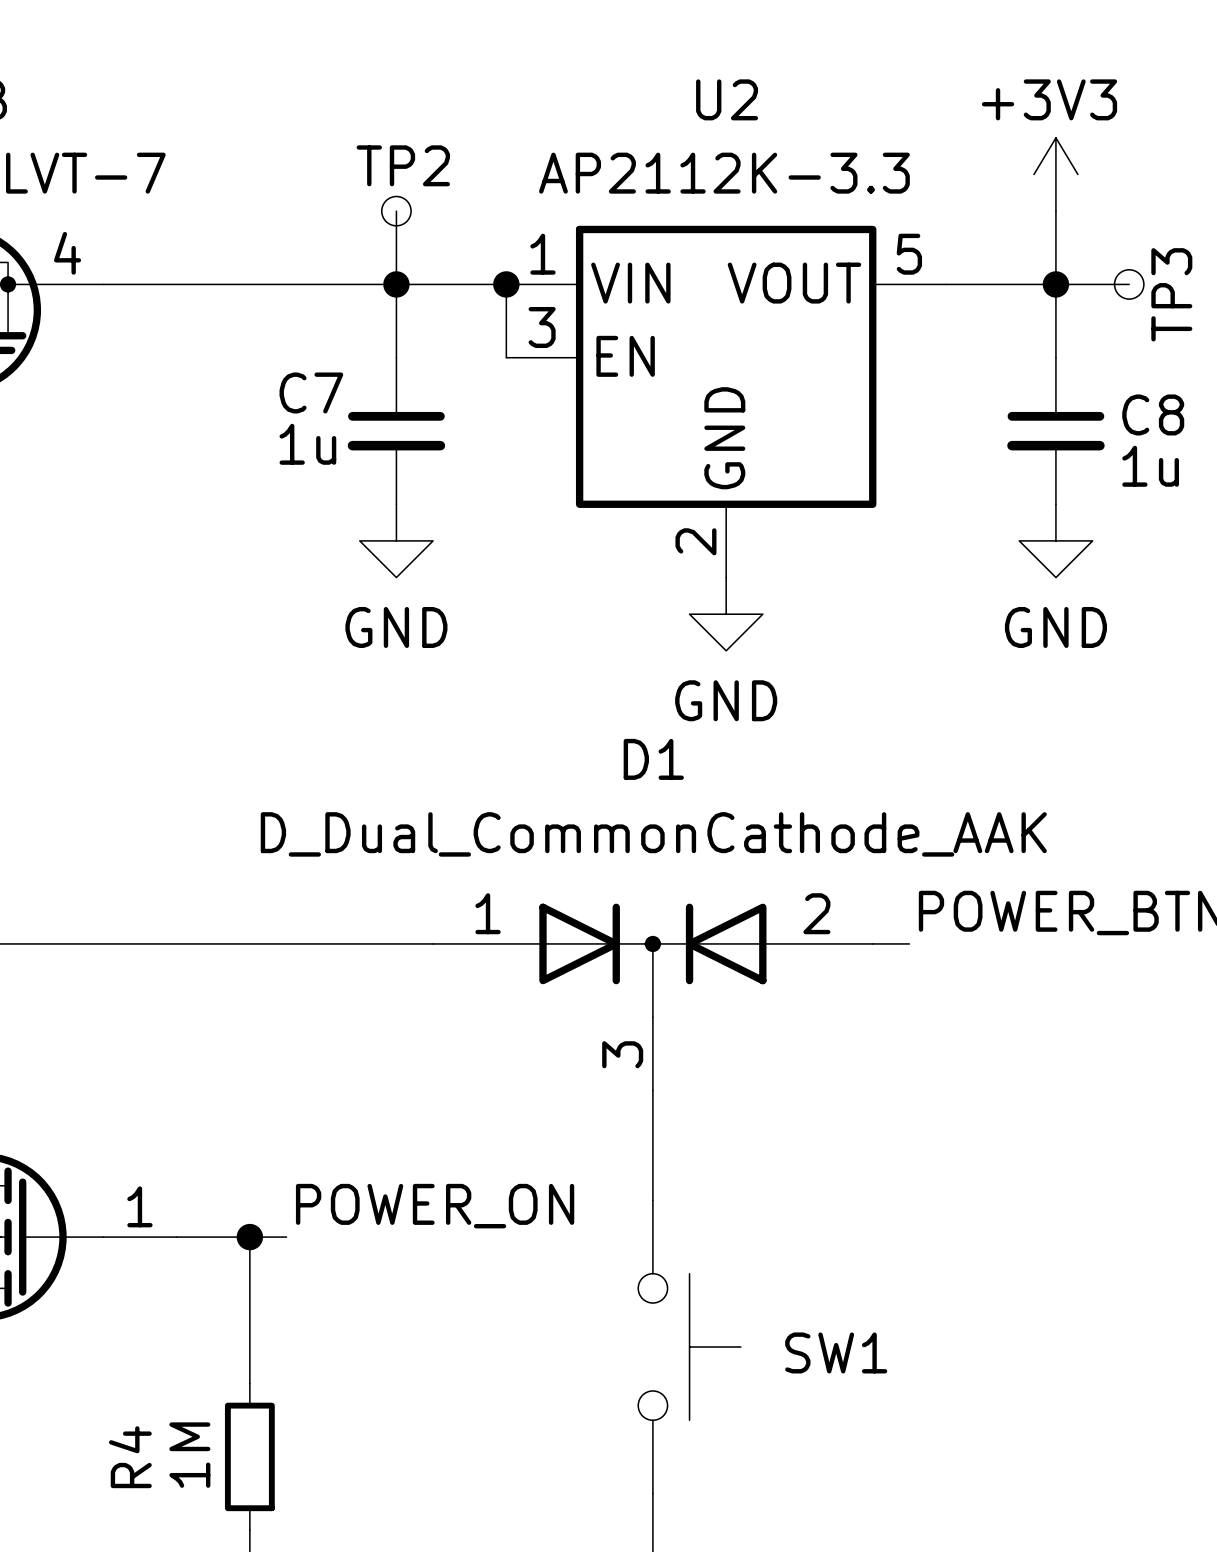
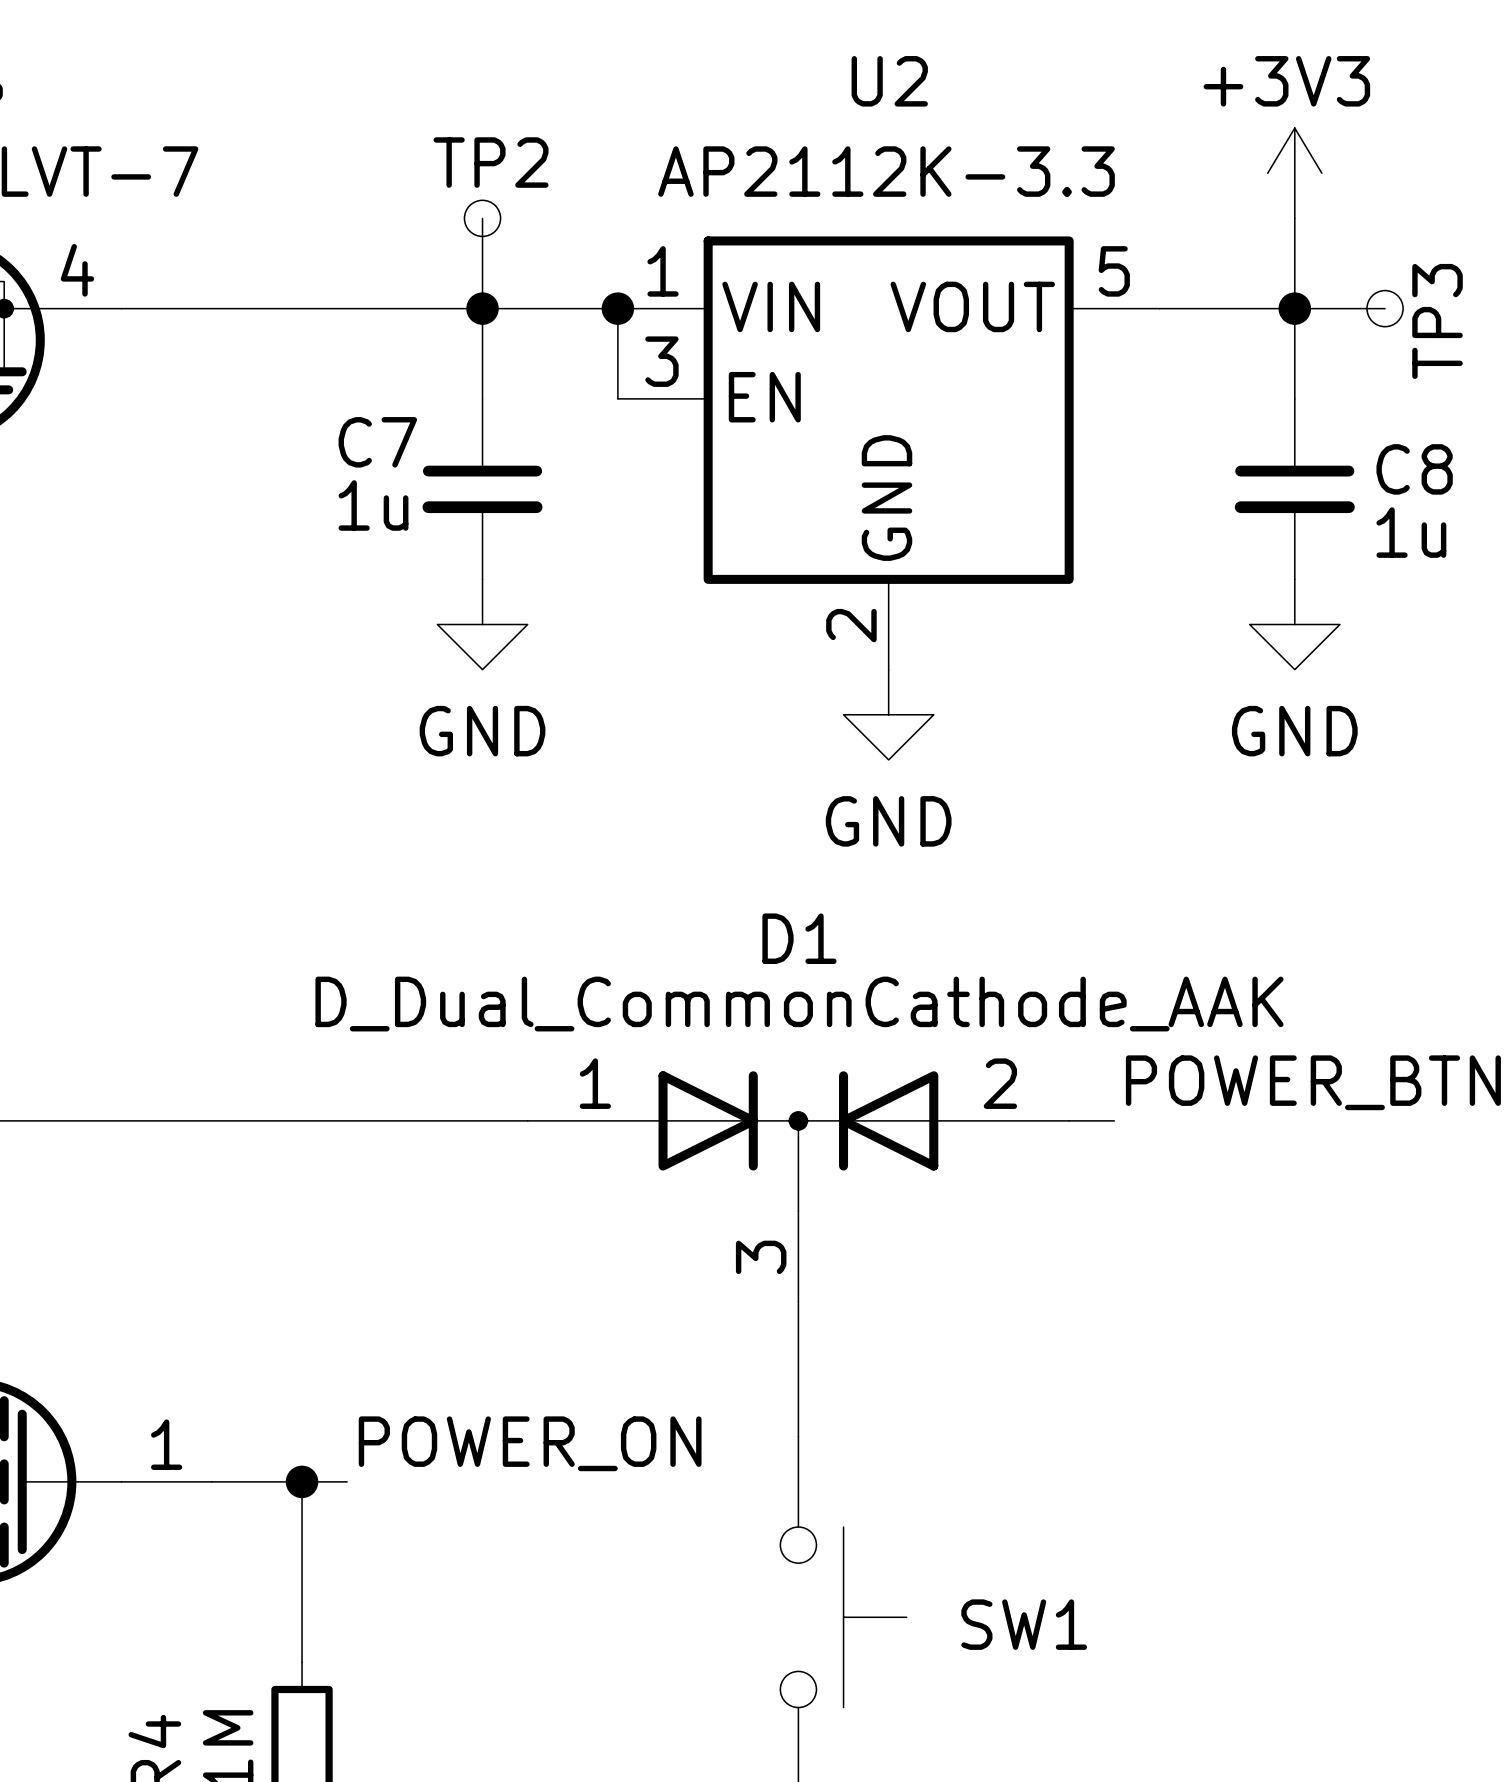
D1 name position: D1 (653, 759) -> D1 (799, 938)
D1 value position: D_Dual_CommonCathode_AAK (653, 834) -> D_Dual_CommonCathode_AAK (799, 1004)

